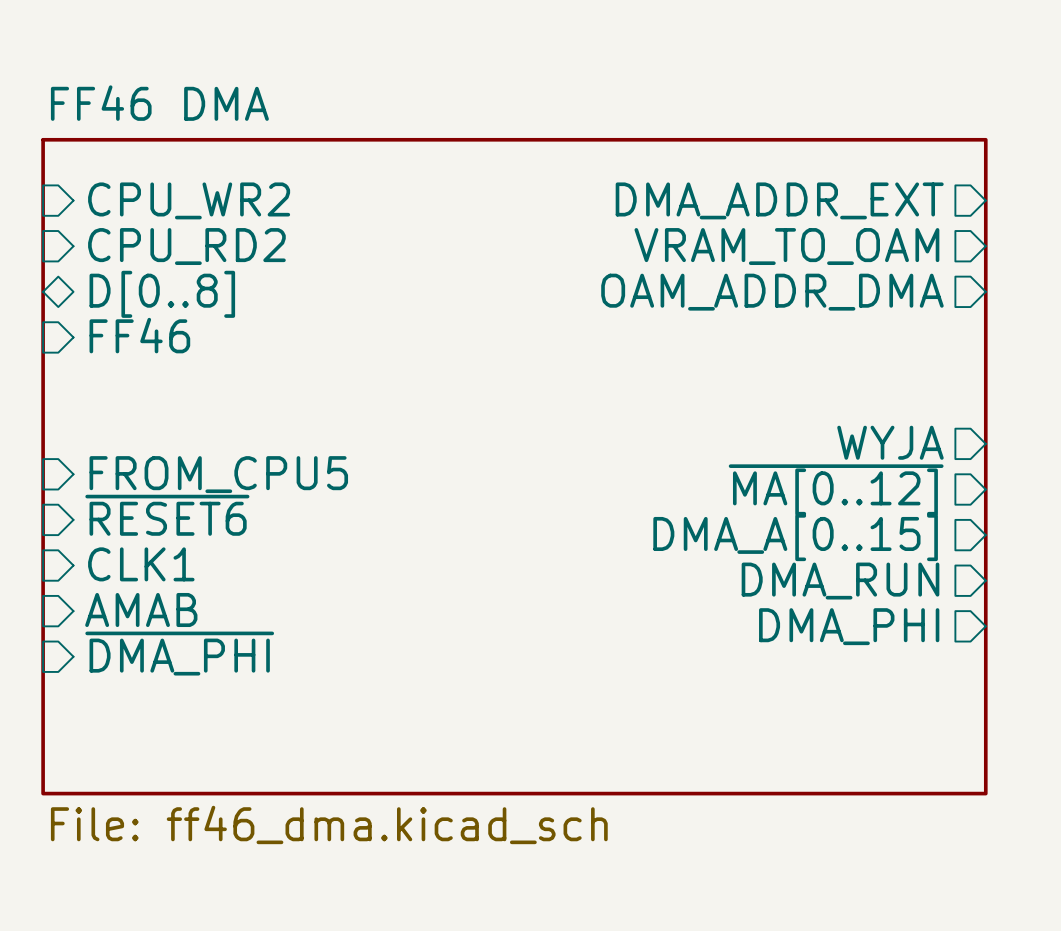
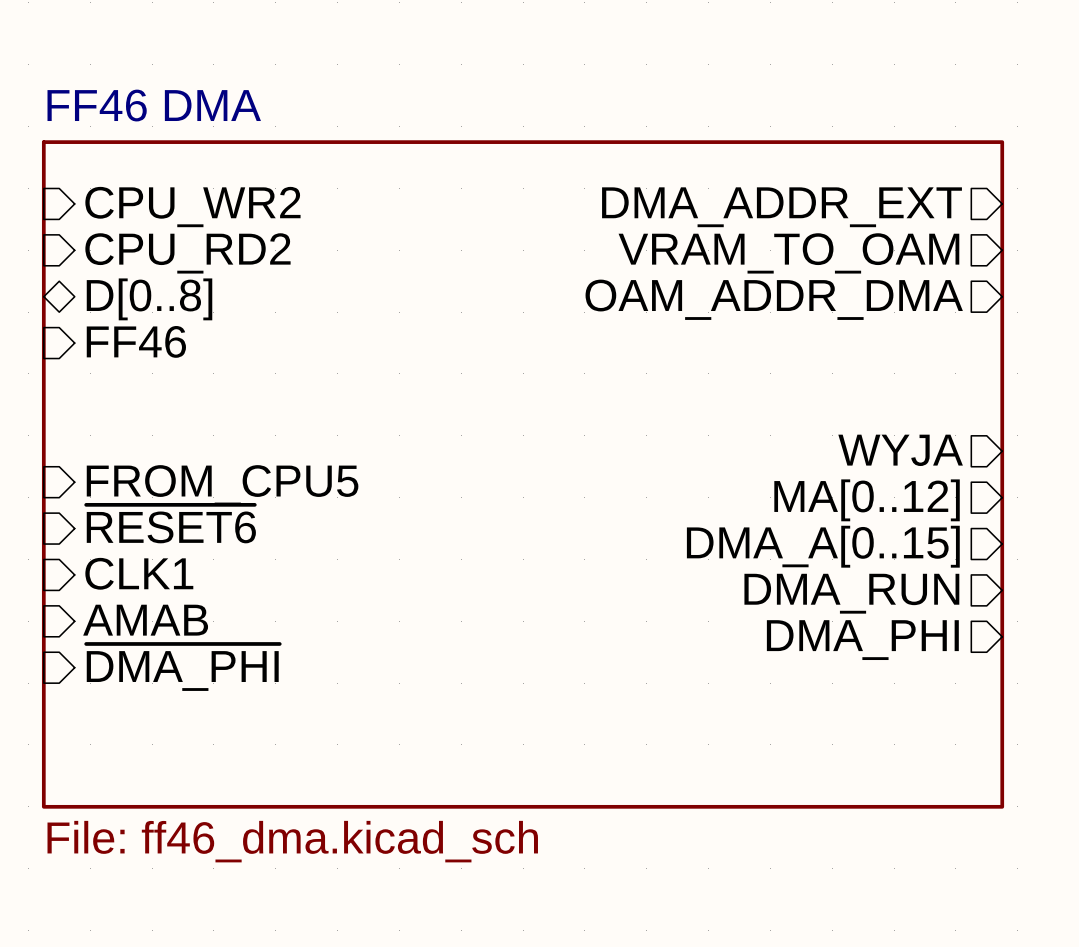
sheet pin: ~{MA[0..12]} (836, 489) -> MA[0..12] (867, 500)

